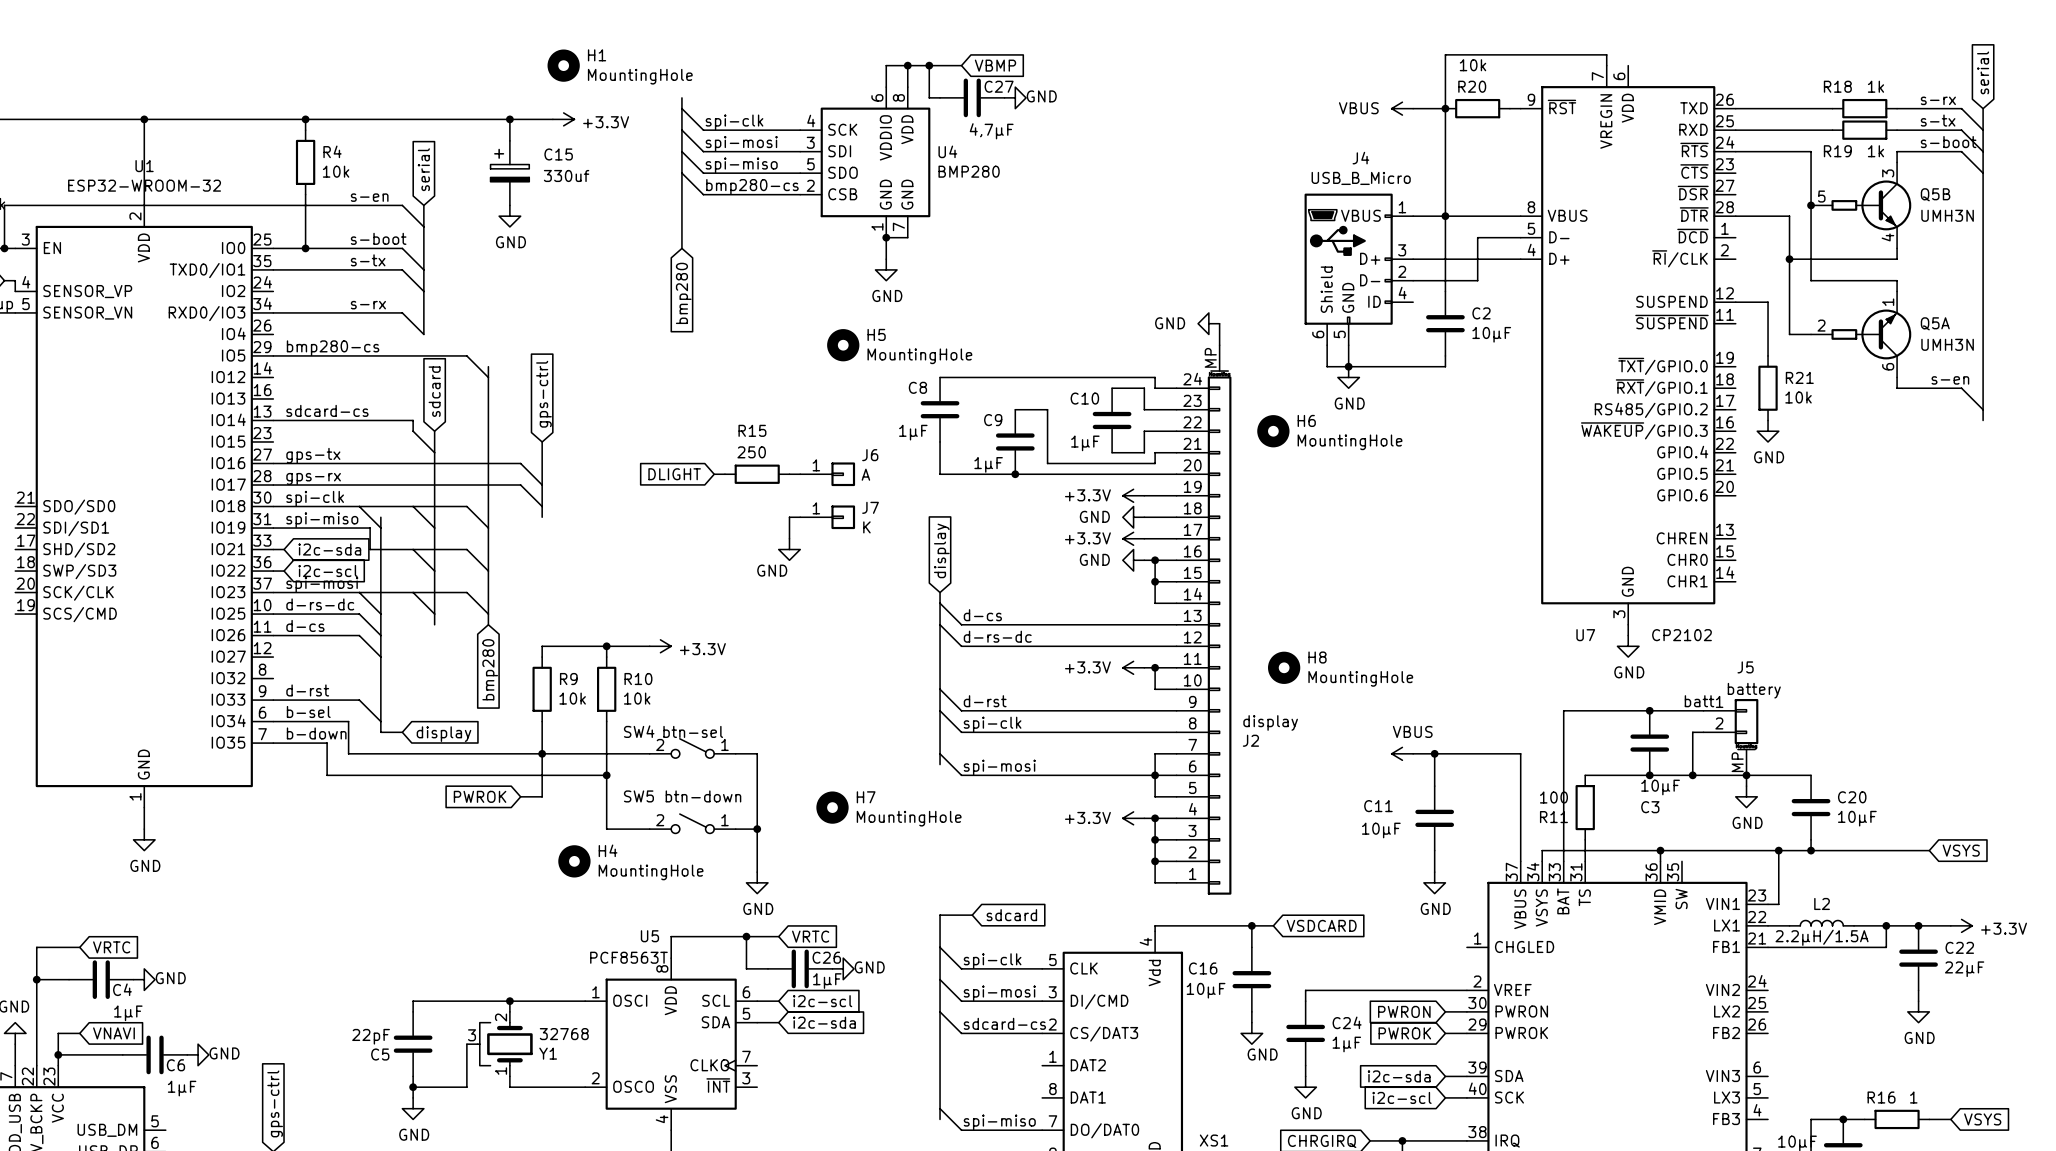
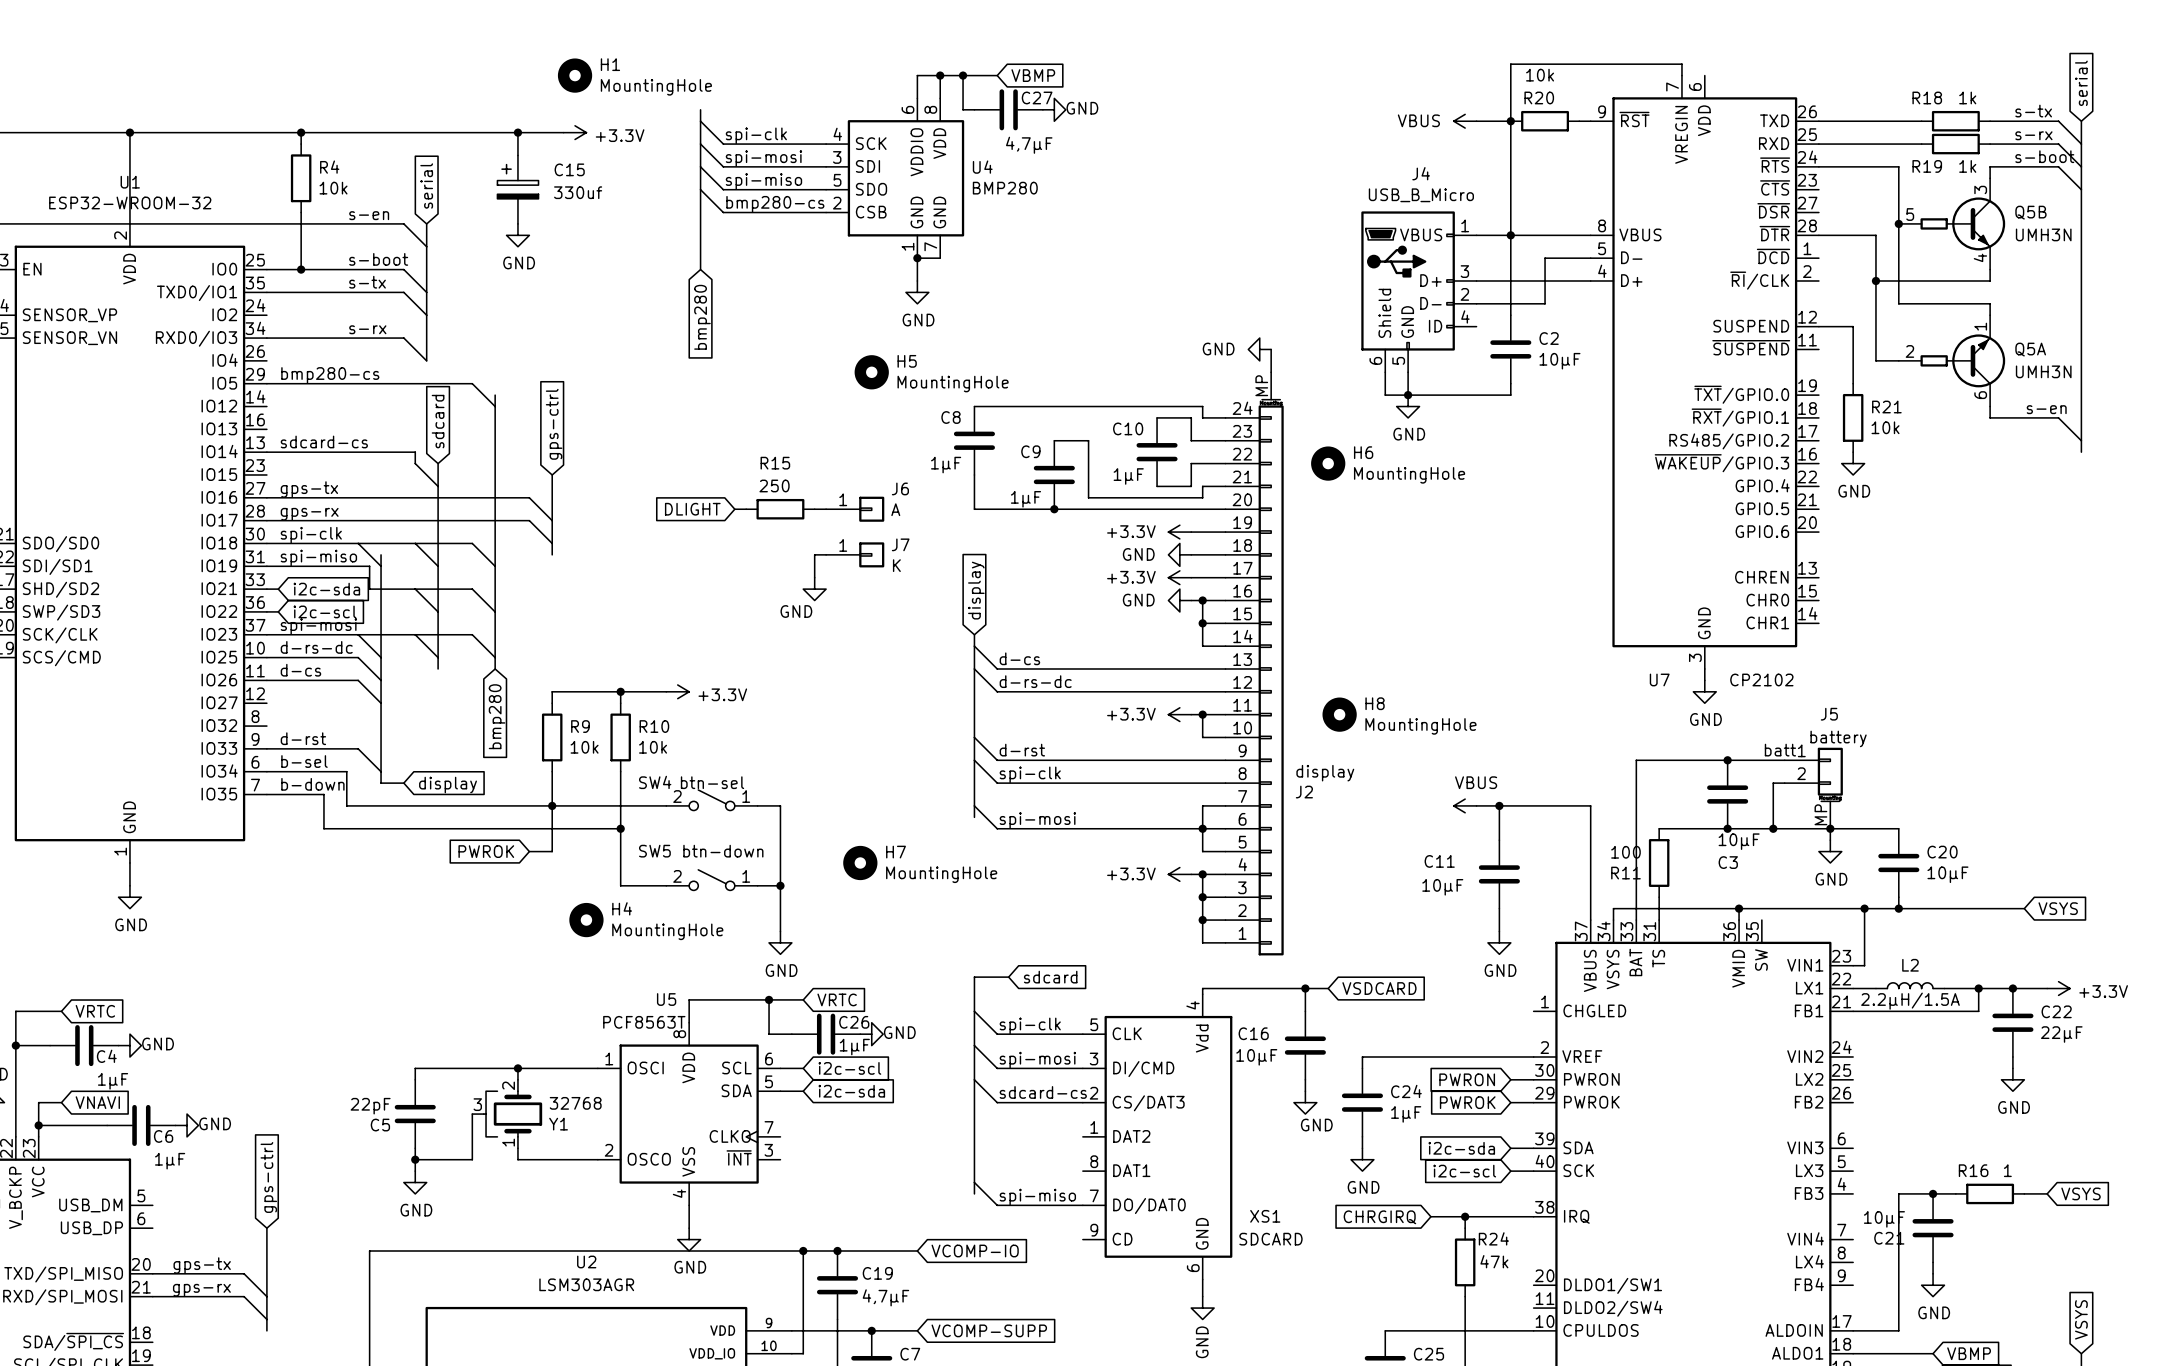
label: s-rx (1938, 100) -> s-tx (2033, 111)
label: s-tx (1938, 120) -> s-rx (2033, 135)

